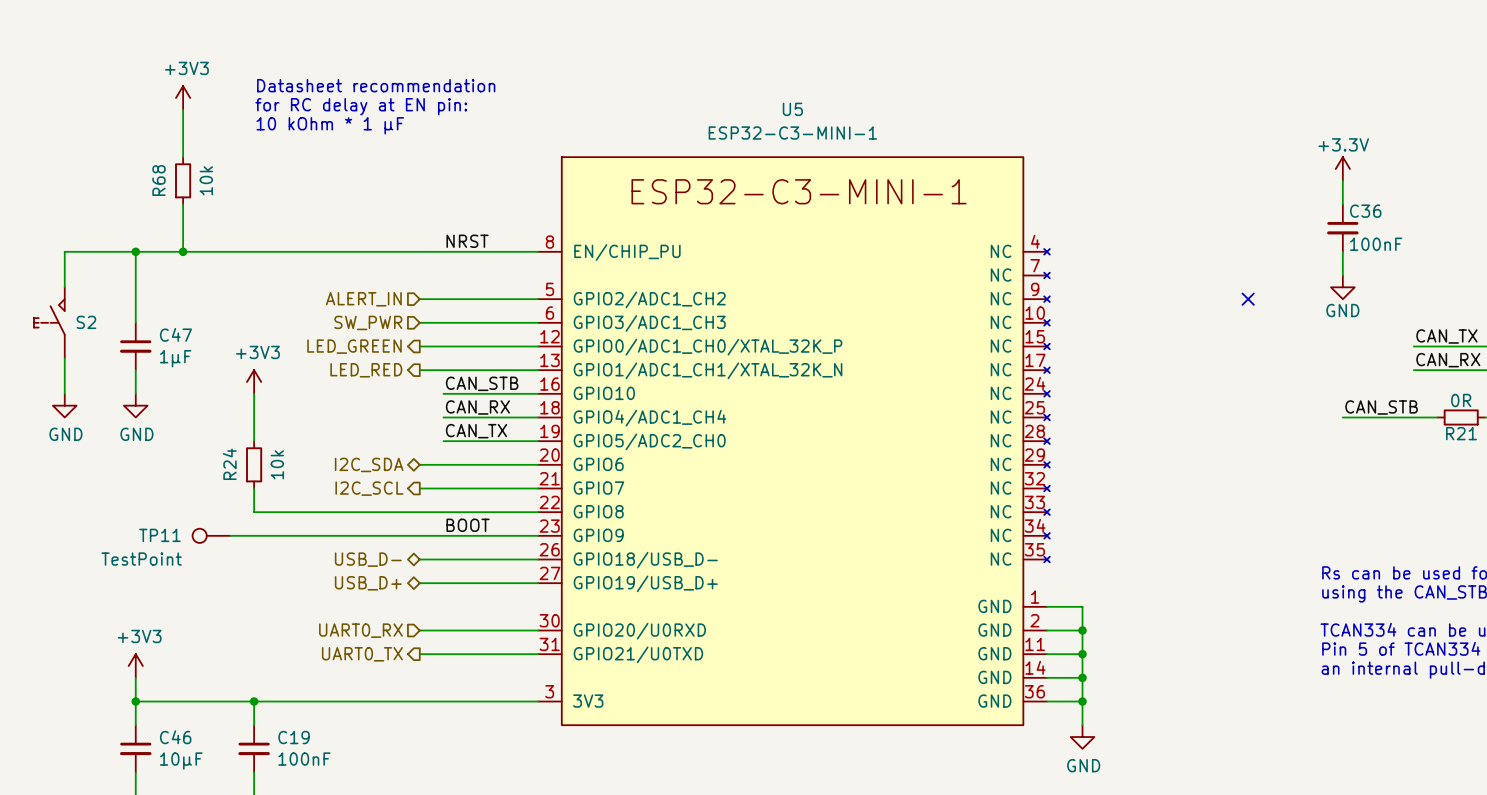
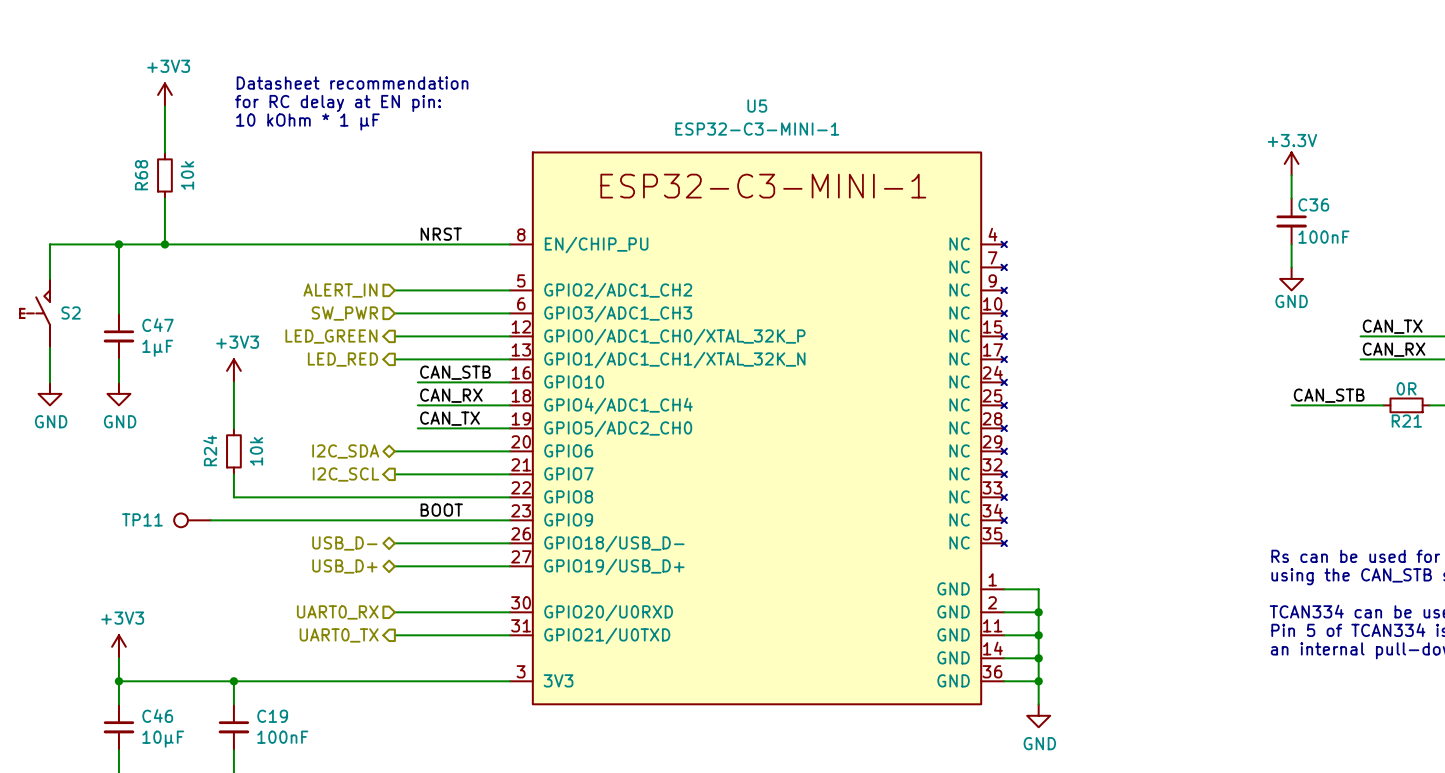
no-connect mark: (1248, 299) -> none
TP11 value: TestPoint (141, 559) -> none

